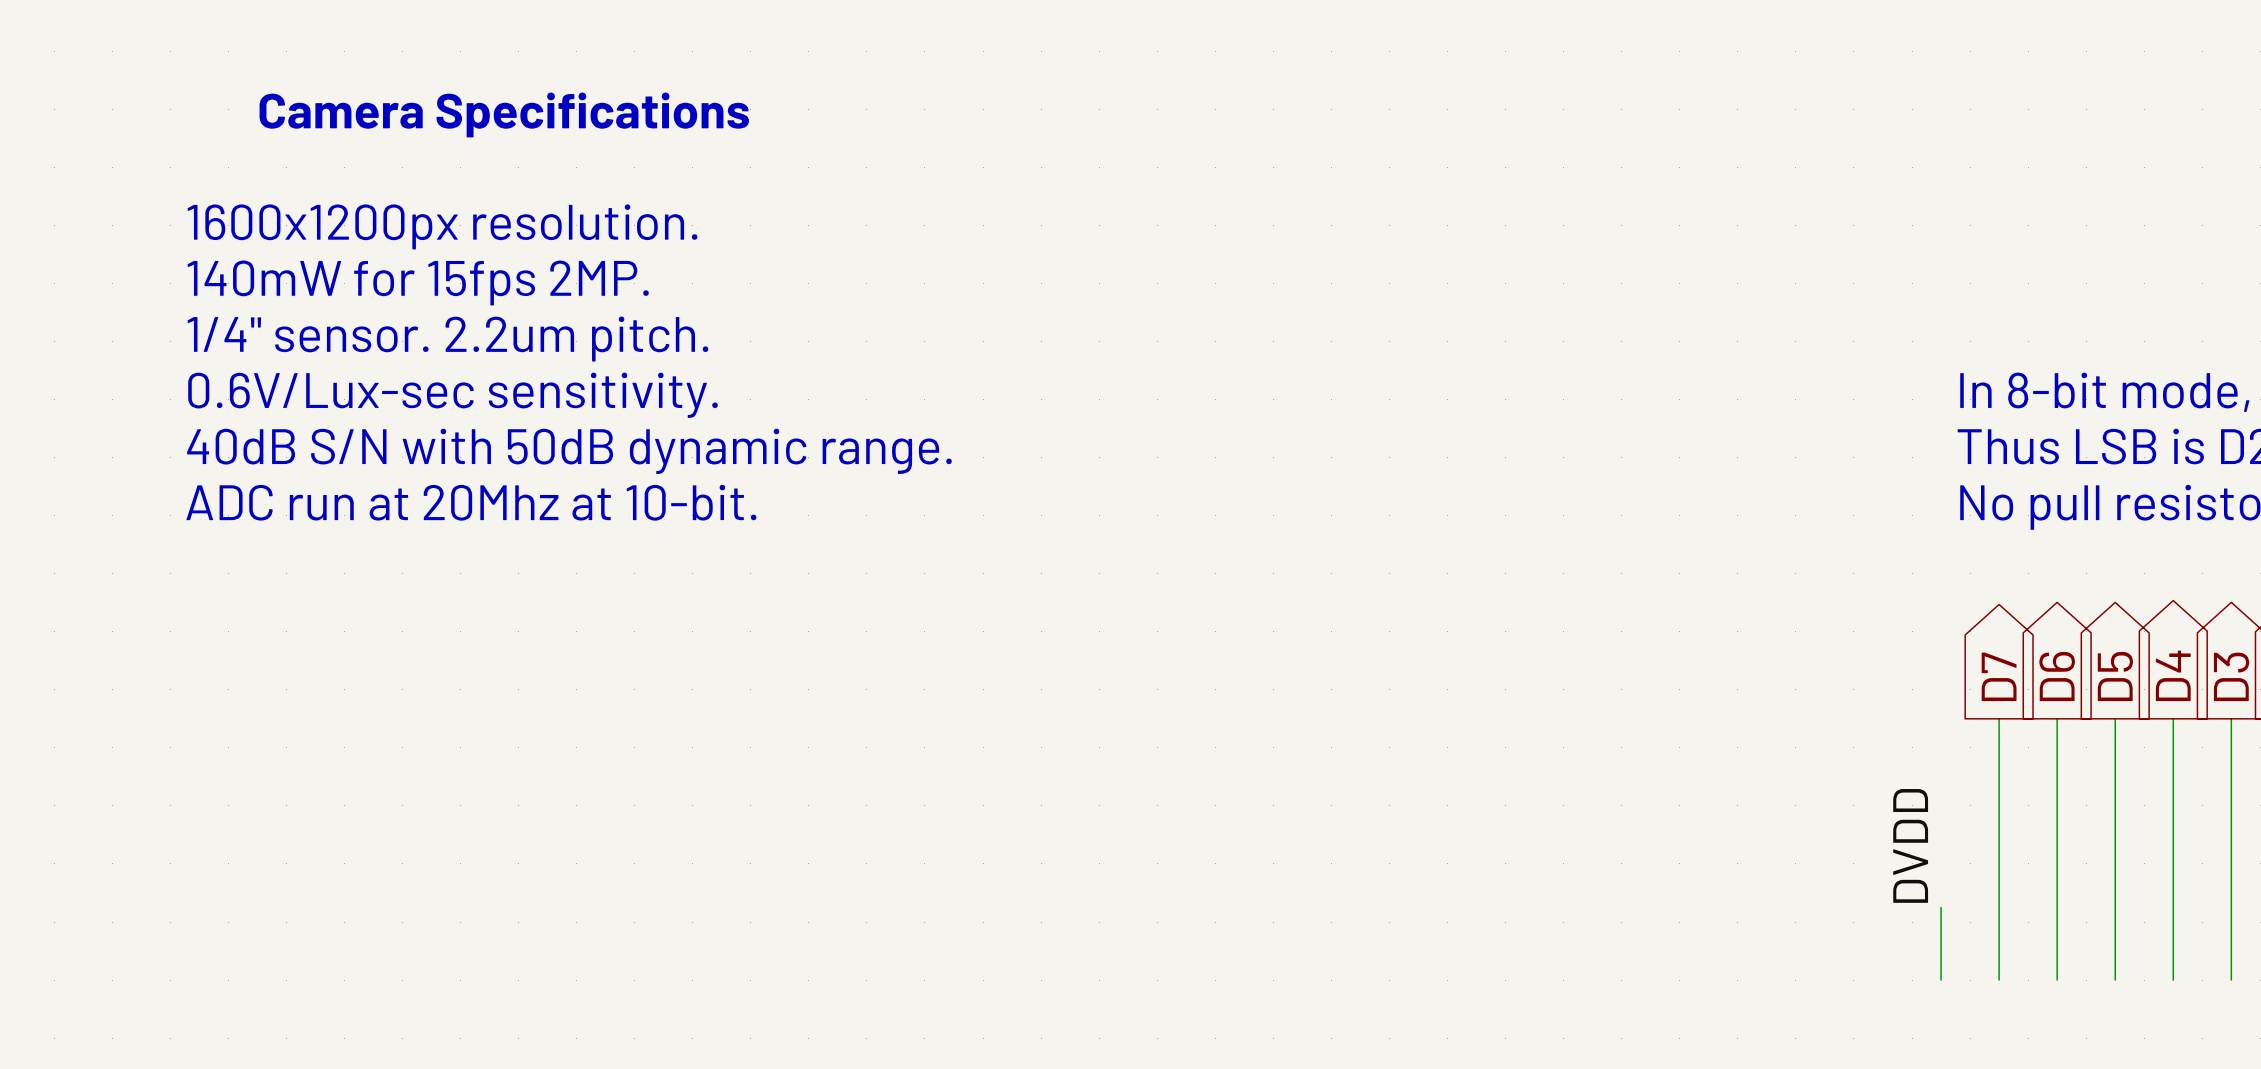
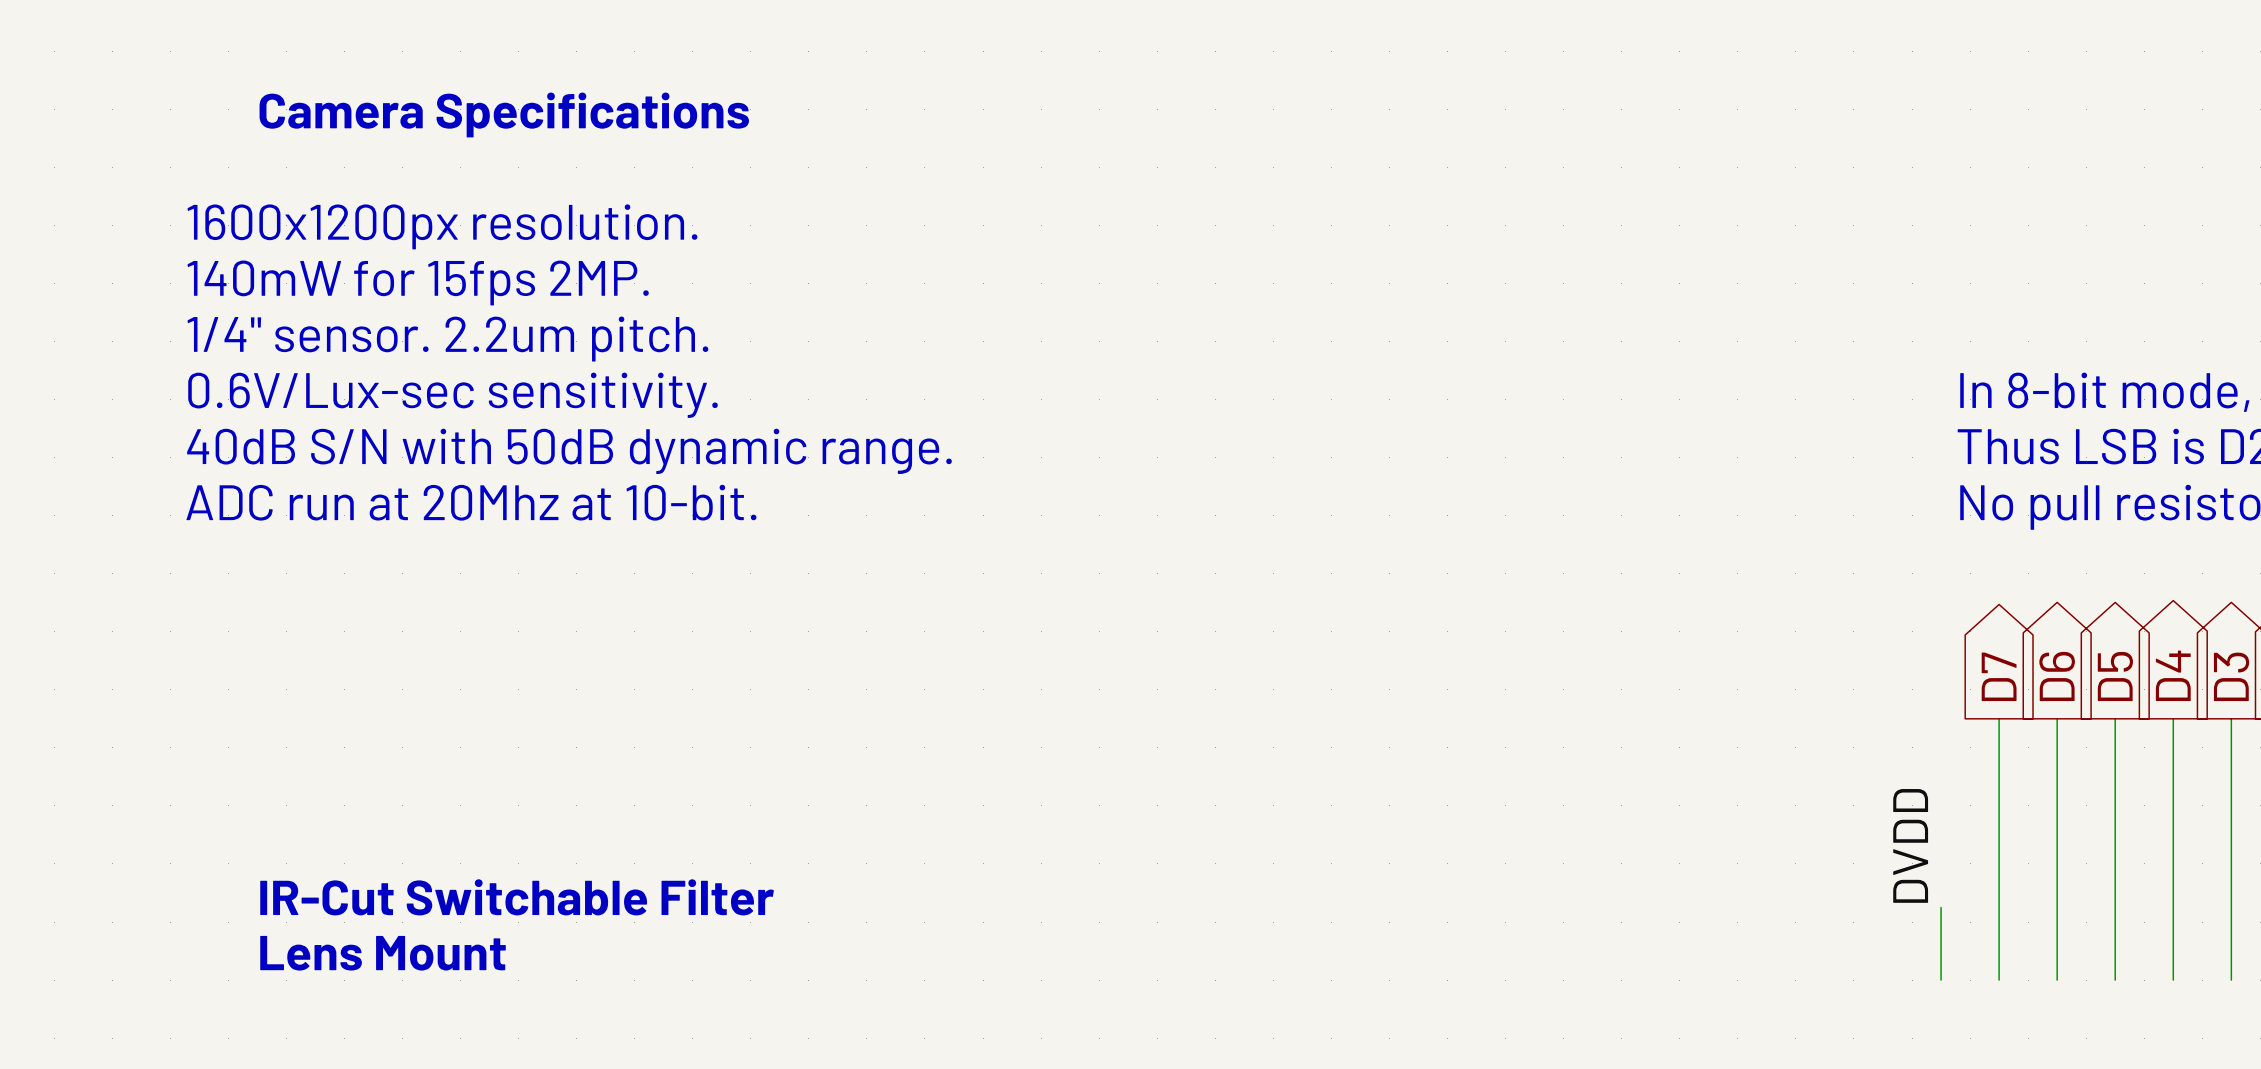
text: none -> IR-Cut Switchable Filter (517, 897)
text: none -> Lens Mount (383, 953)

